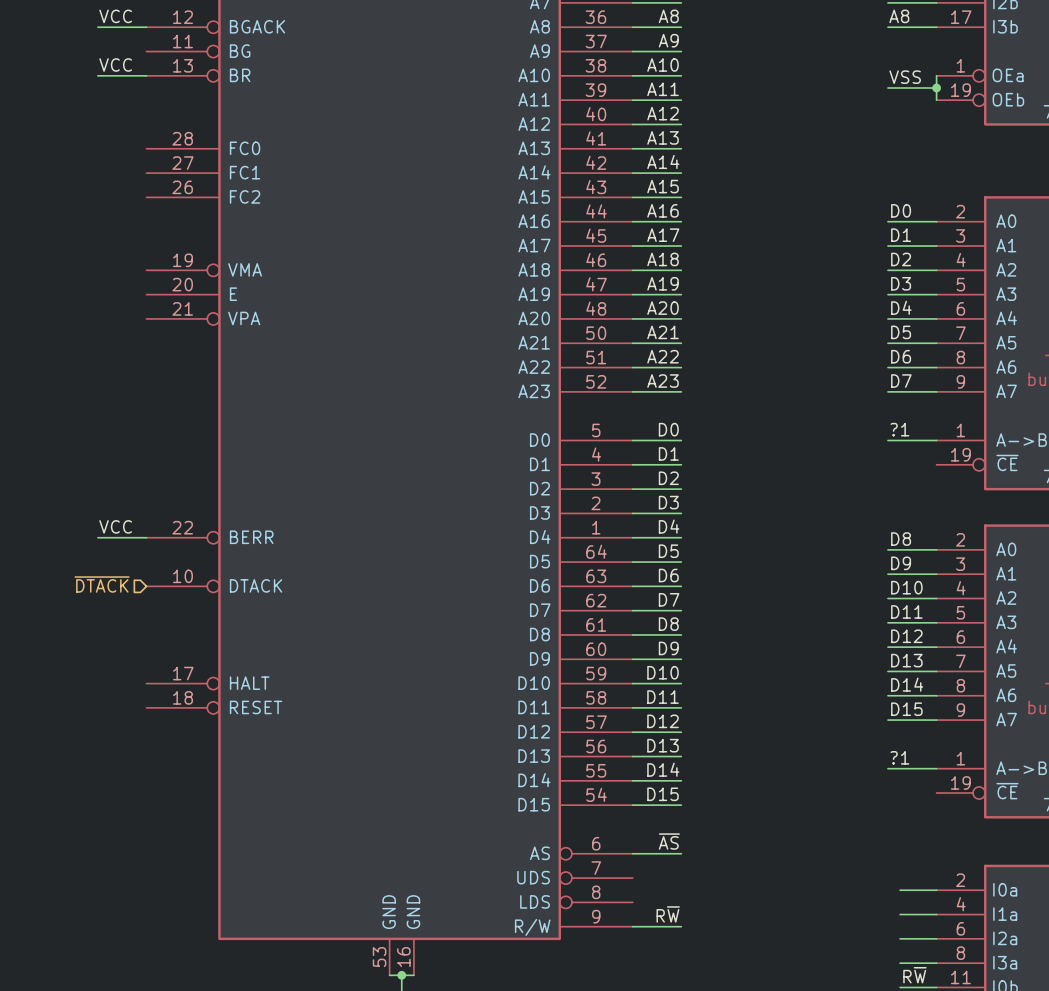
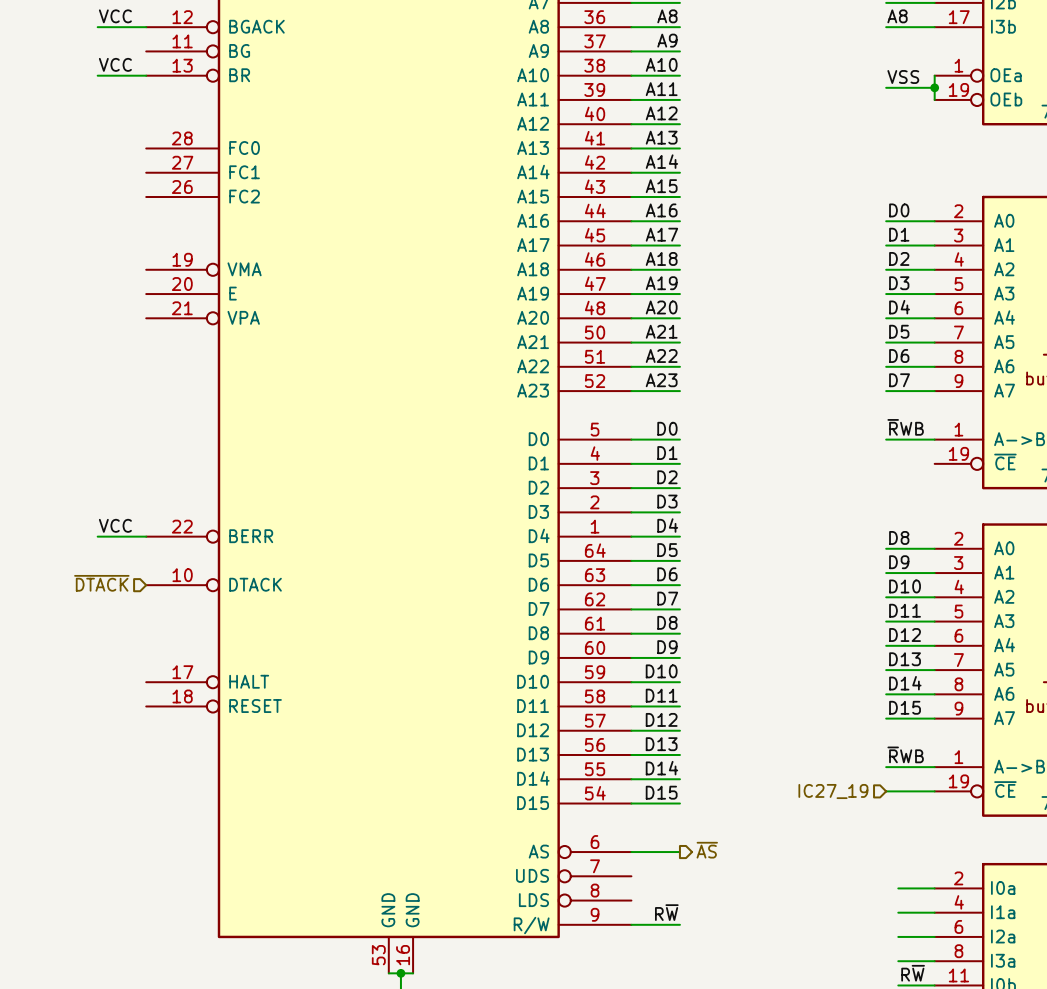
label: ?1 (899, 429) -> ~{R}WB (905, 427)
label: ?1 (899, 757) -> ~{R}WB (905, 754)
wire: none -> (886, 791) (934, 791)
hierarchical label: none -> IC27_19 (833, 791)
label: ~{AS} (669, 841) -> none
hierarchical label: none -> ~{AS} (707, 850)

